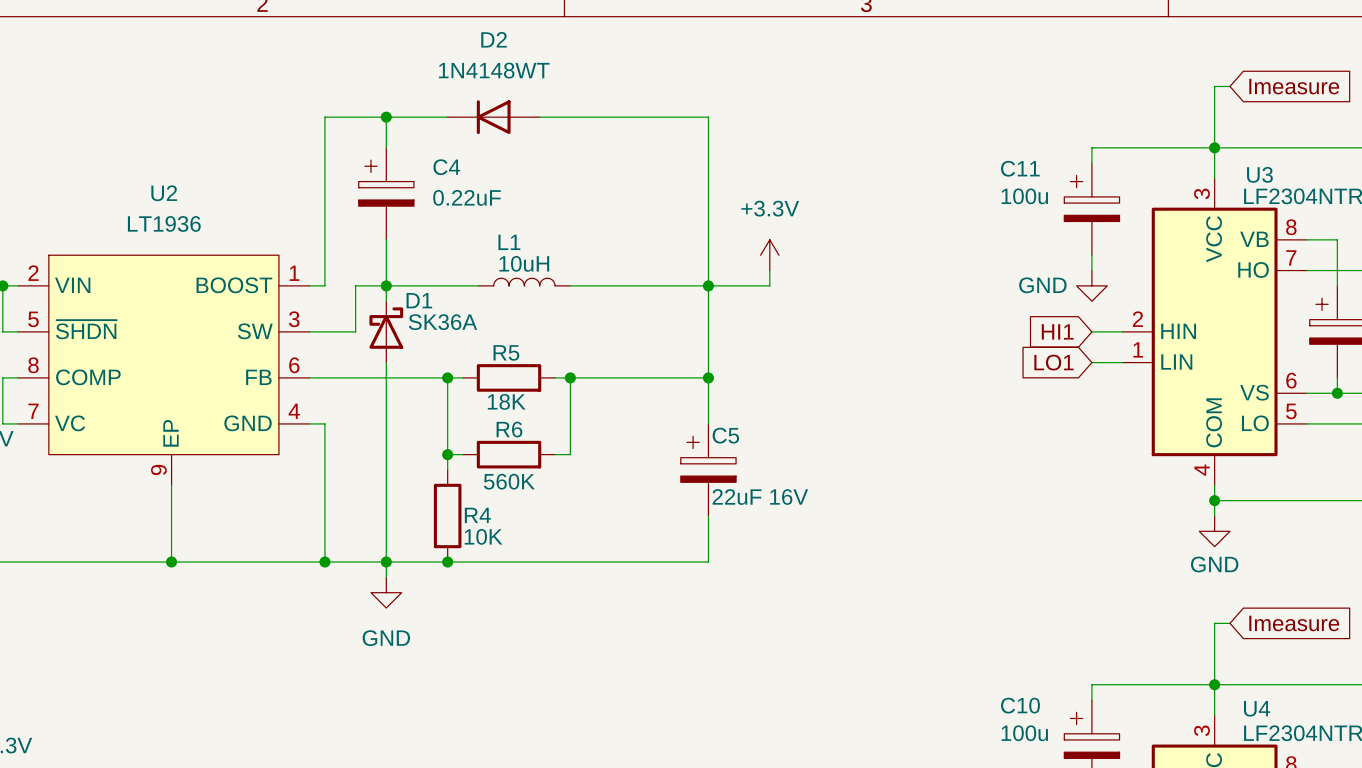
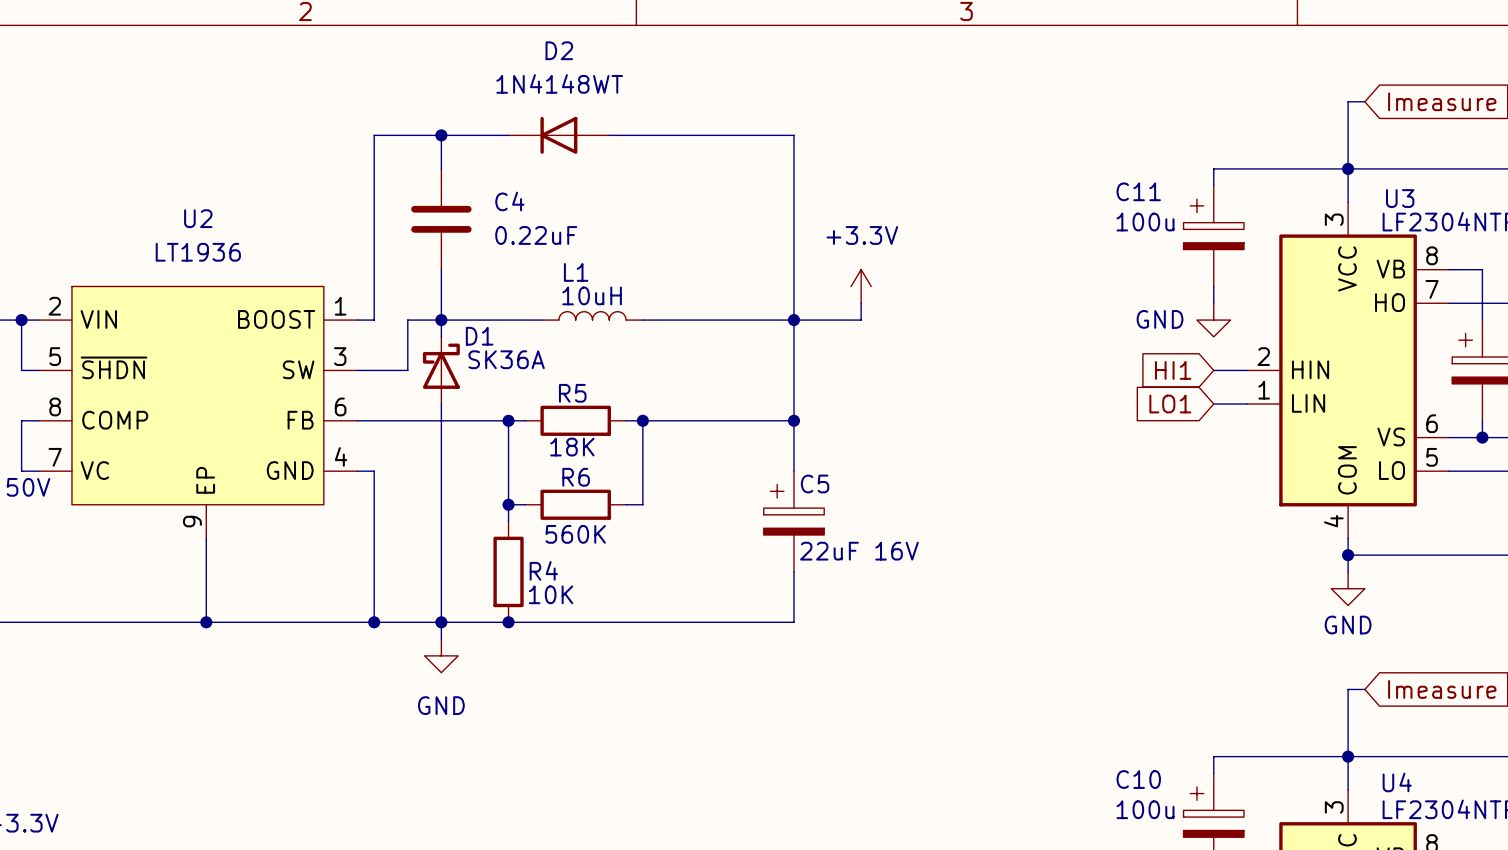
C4 symbol: [358, 147, 414, 240] -> [411, 168, 472, 270]

